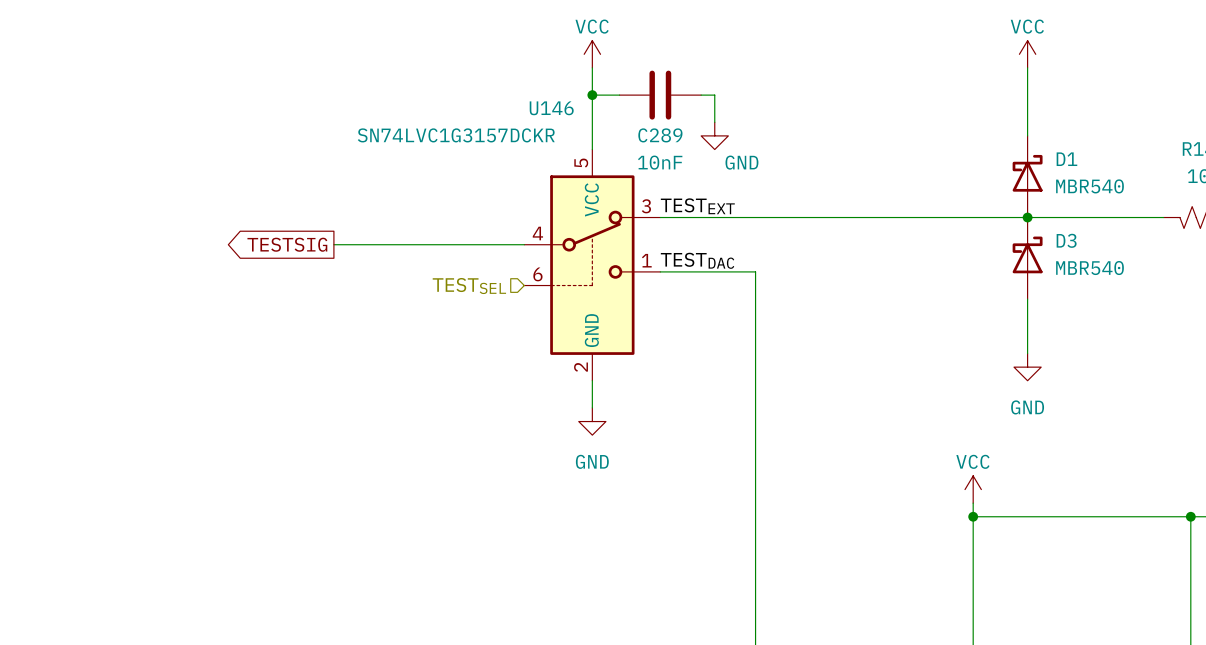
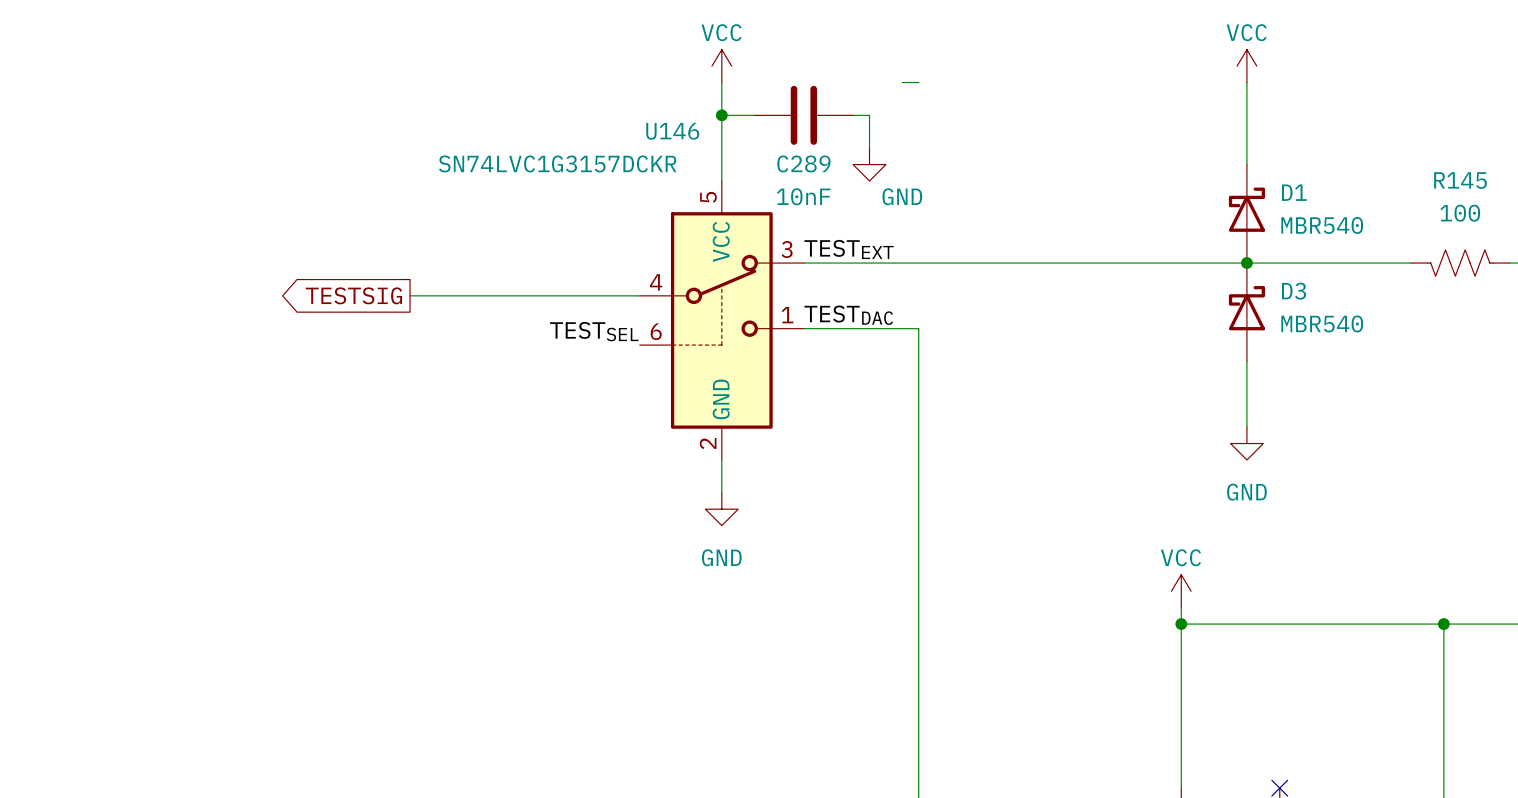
wire: none -> (902, 82) (918, 82)
label: none -> TESTSEL (594, 331)
hierarchical label: TESTSEL (469, 286) -> none

